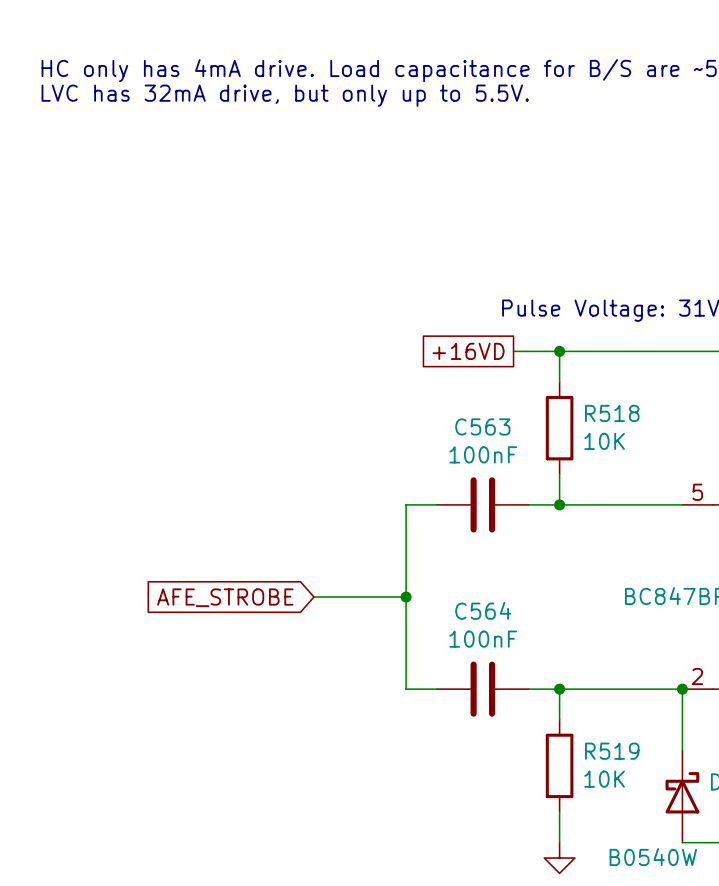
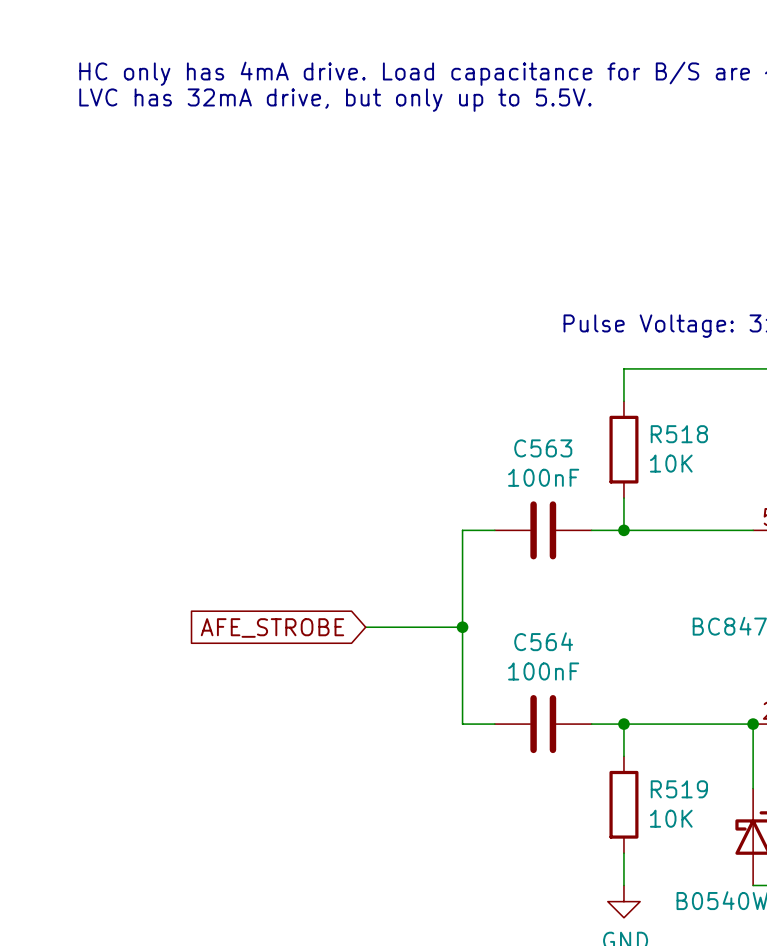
global label: +16VD (468, 351) -> none
wire: (513, 351) (559, 351) -> none
junction: (559, 351) -> none

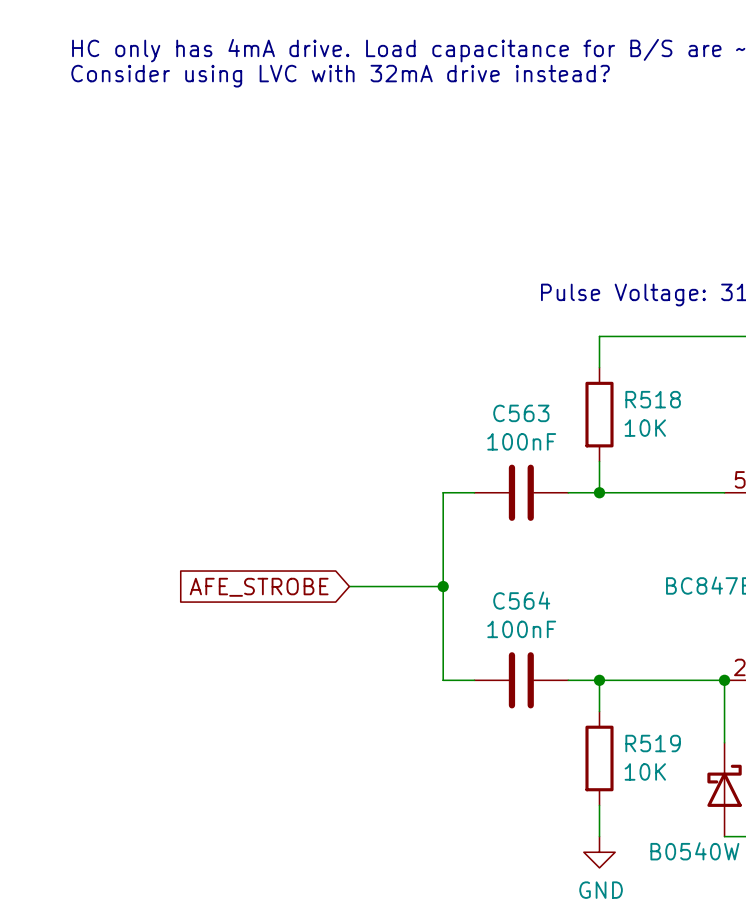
text: LVC has 32mA drive, but only up to 5.5V. (335, 100) -> Consider using LVC with 32mA drive instead? (340, 76)

